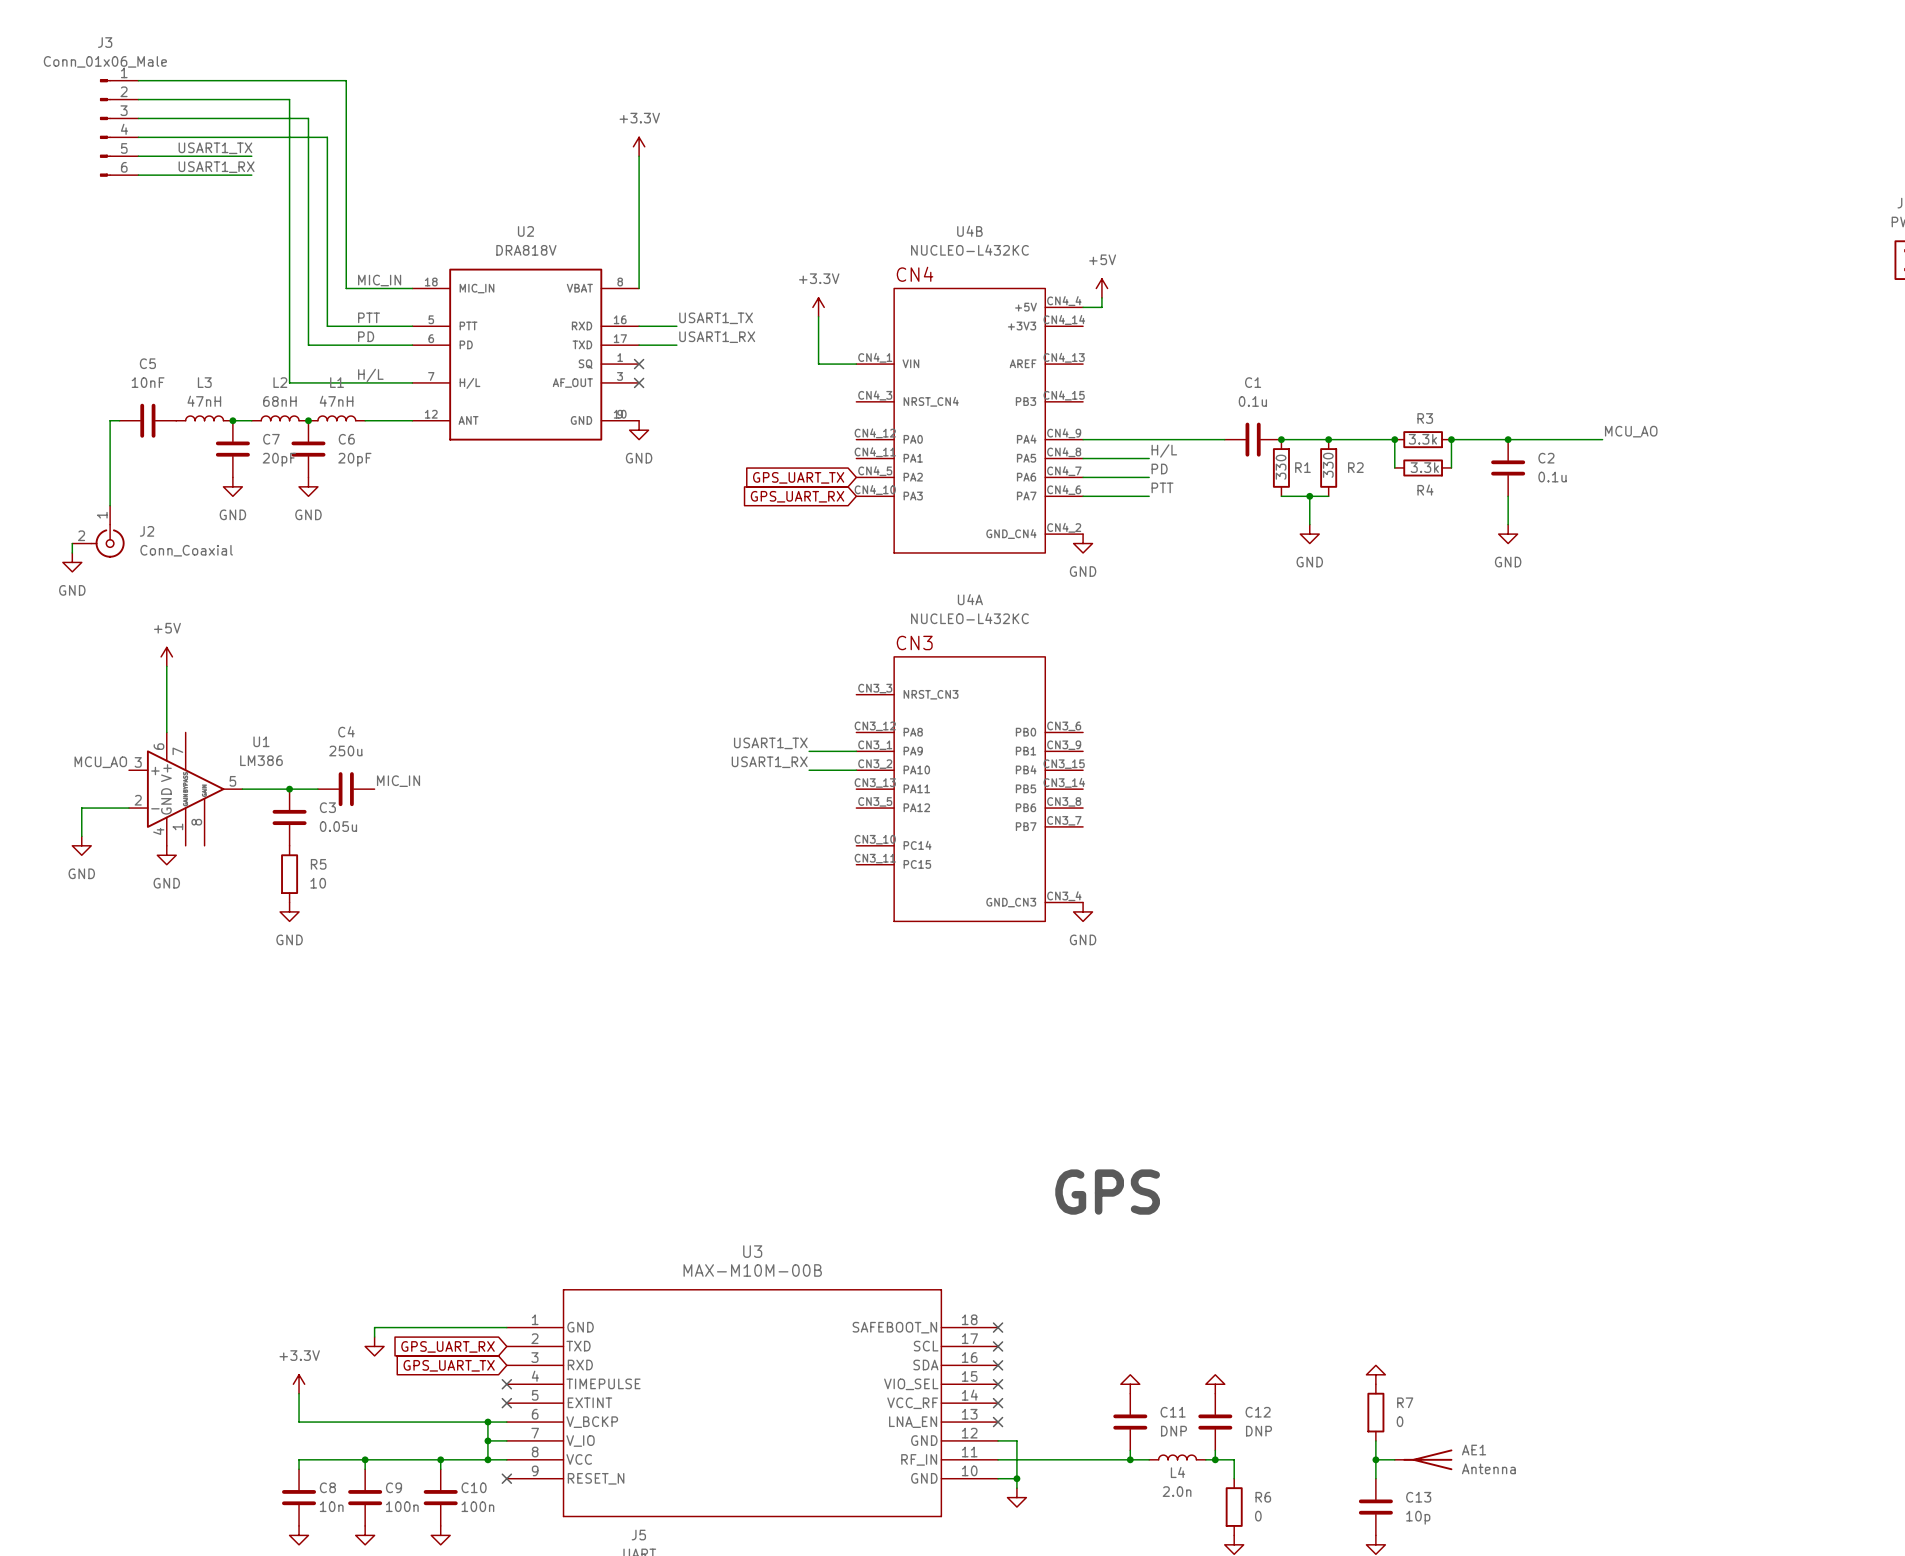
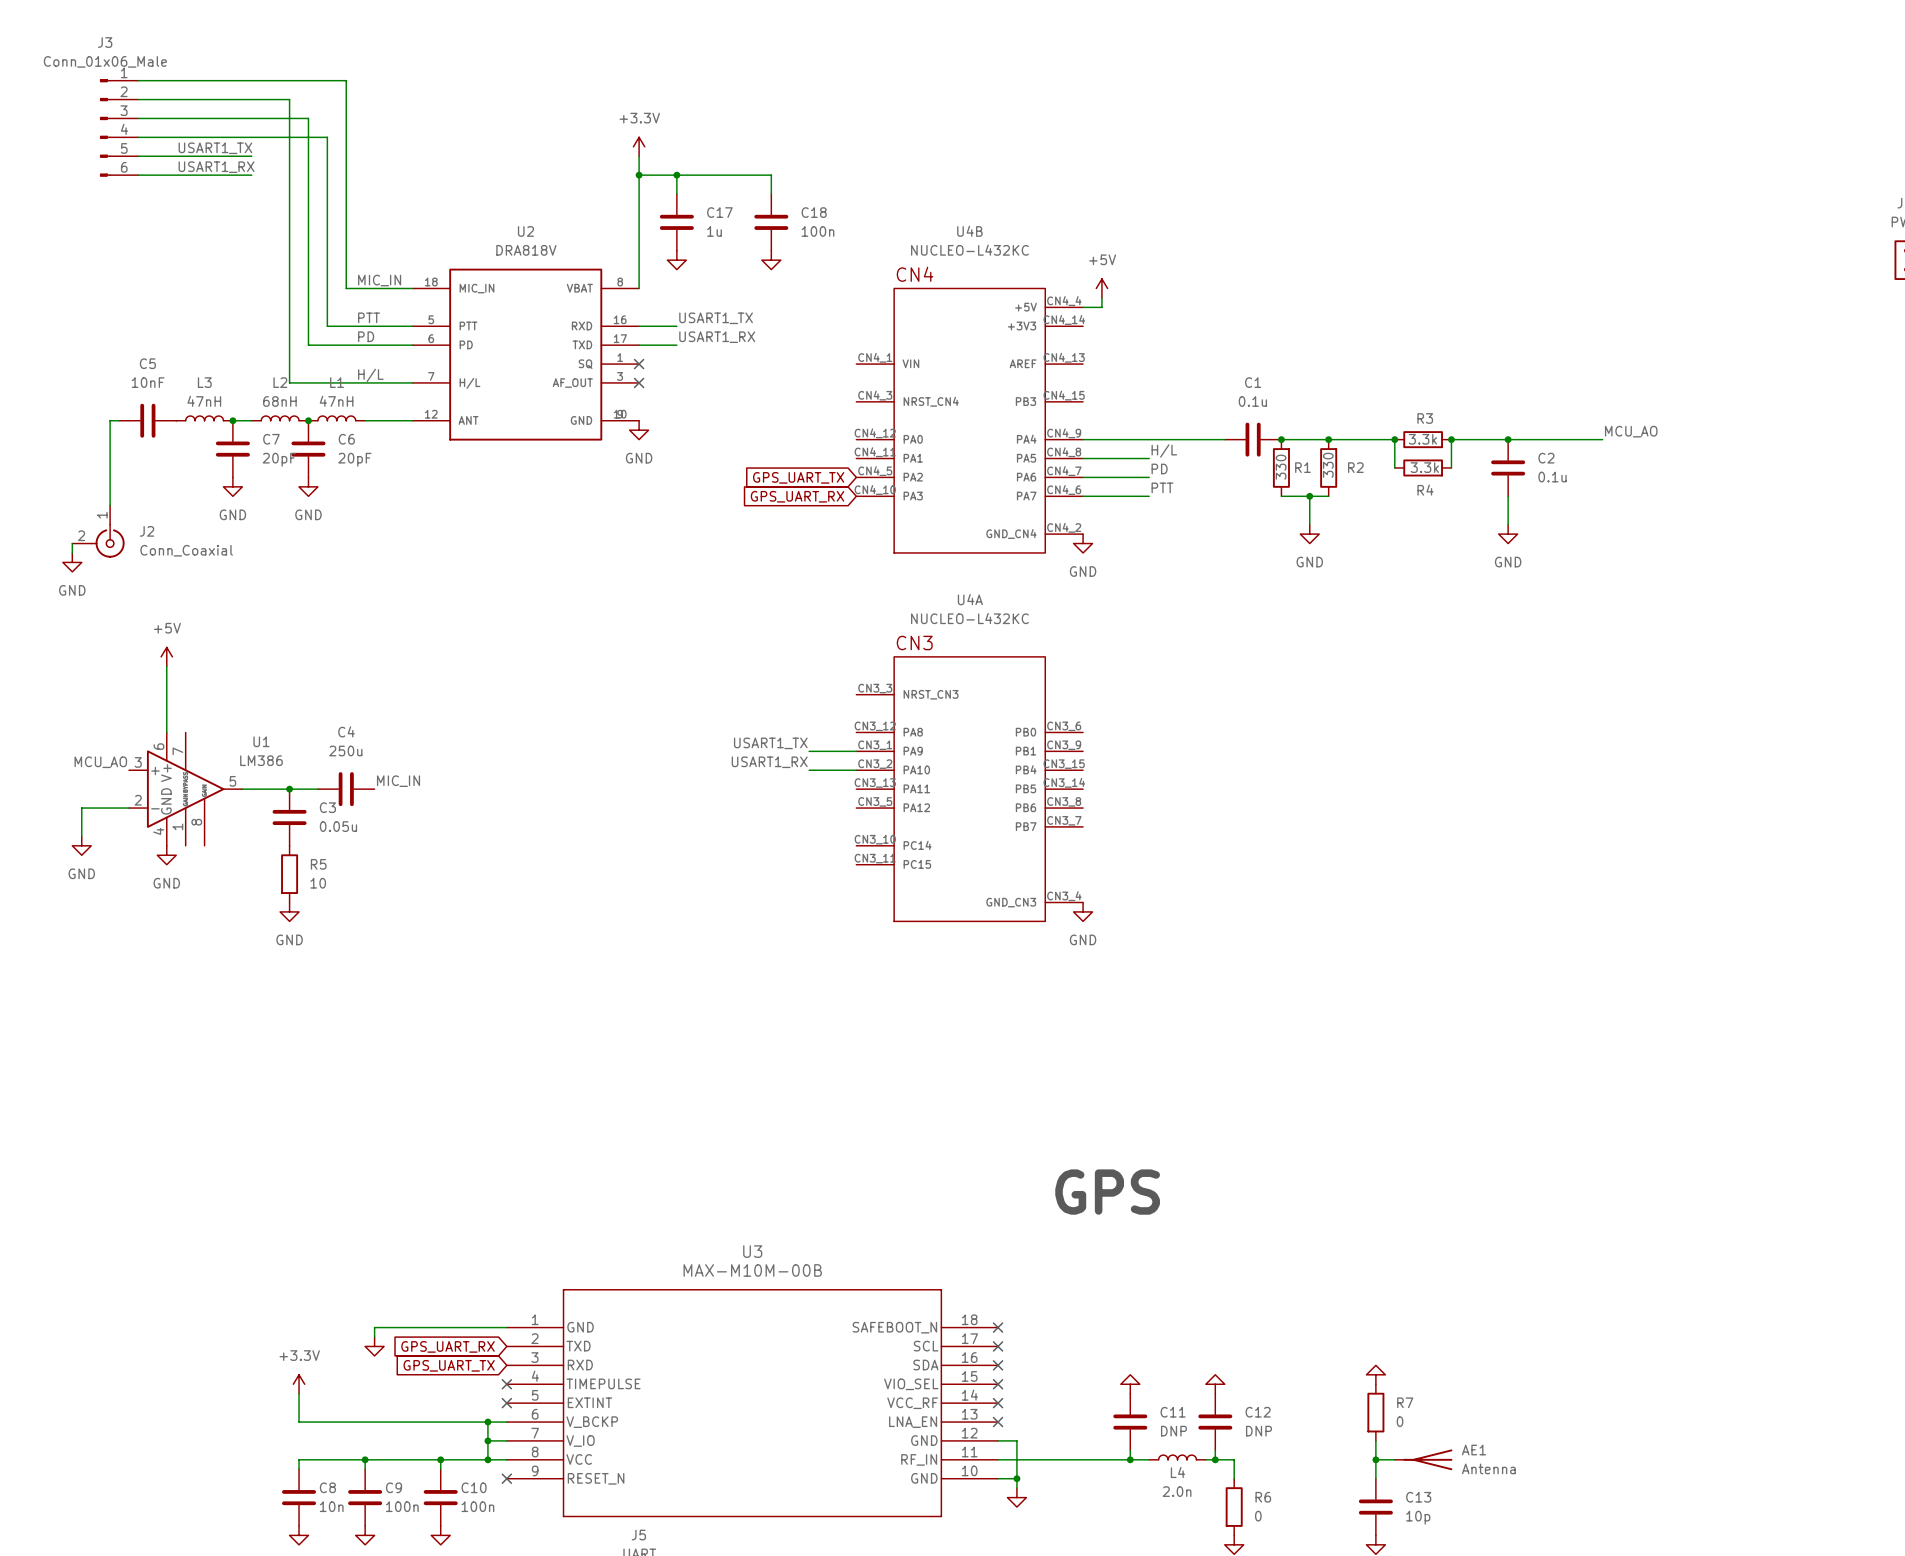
wire: none -> (639, 175) (771, 175) (771, 194)
junction: none -> (639, 175)
wire: none -> (676, 175) (676, 194)
junction: none -> (676, 175)
C17: none -> 1u (676, 222)
C18: none -> 100n (771, 222)
power symbol: none -> (676, 260)
power symbol: none -> (771, 260)
power symbol: +3.3V (818, 307) -> none
wire: (818, 316) (818, 364) (856, 364) -> none

